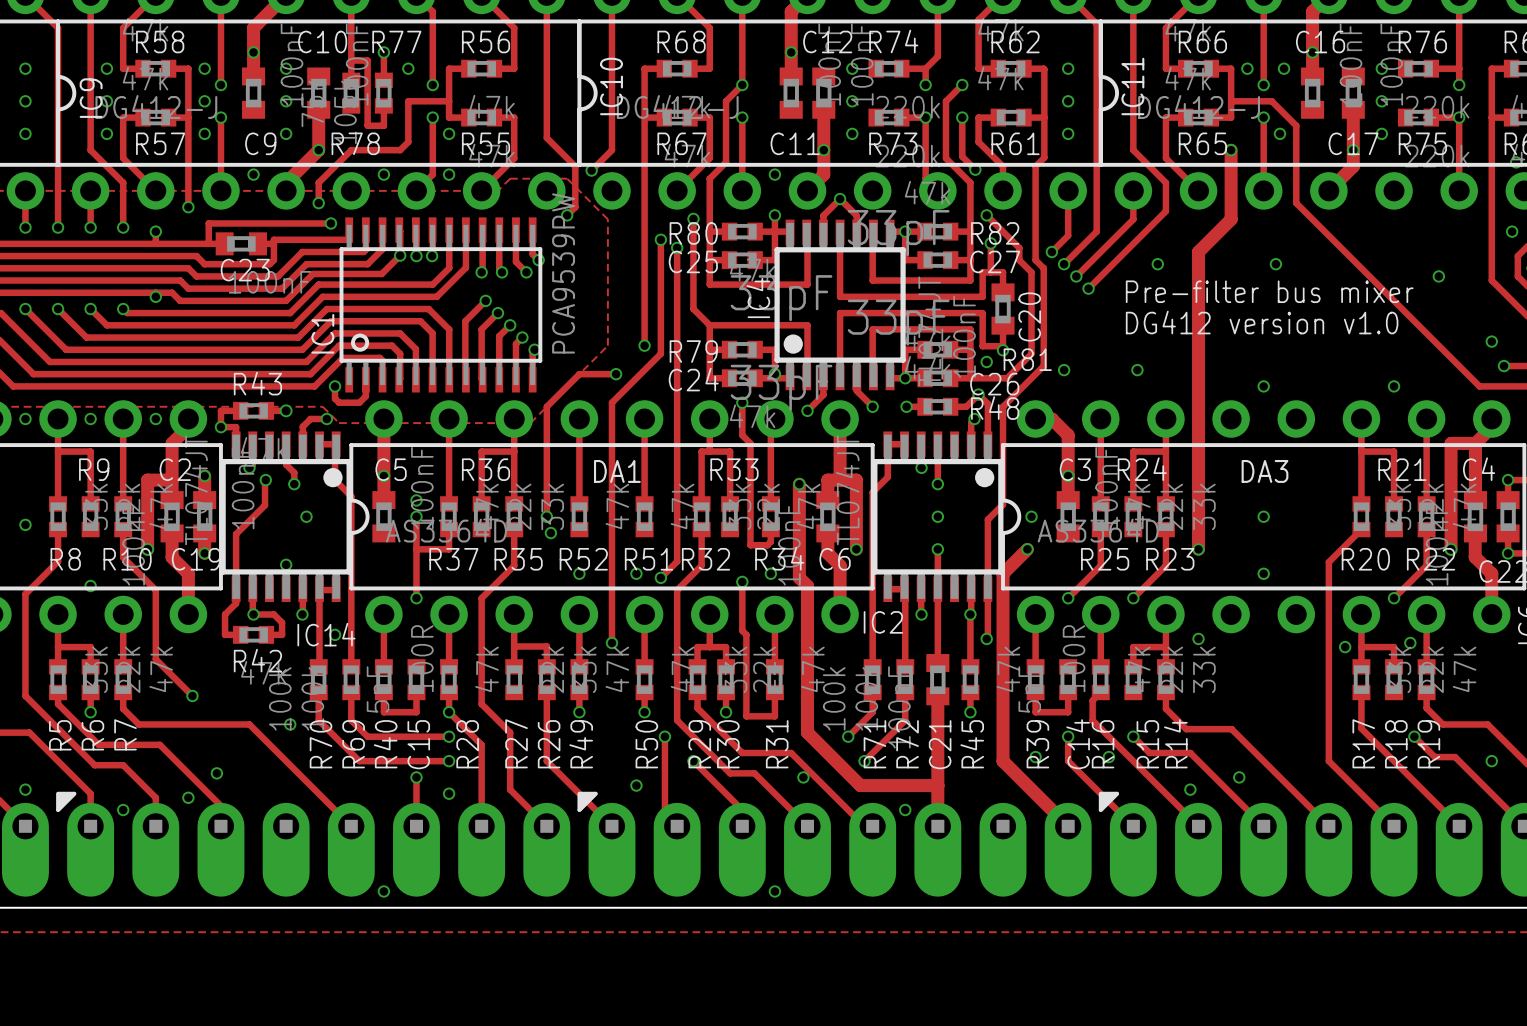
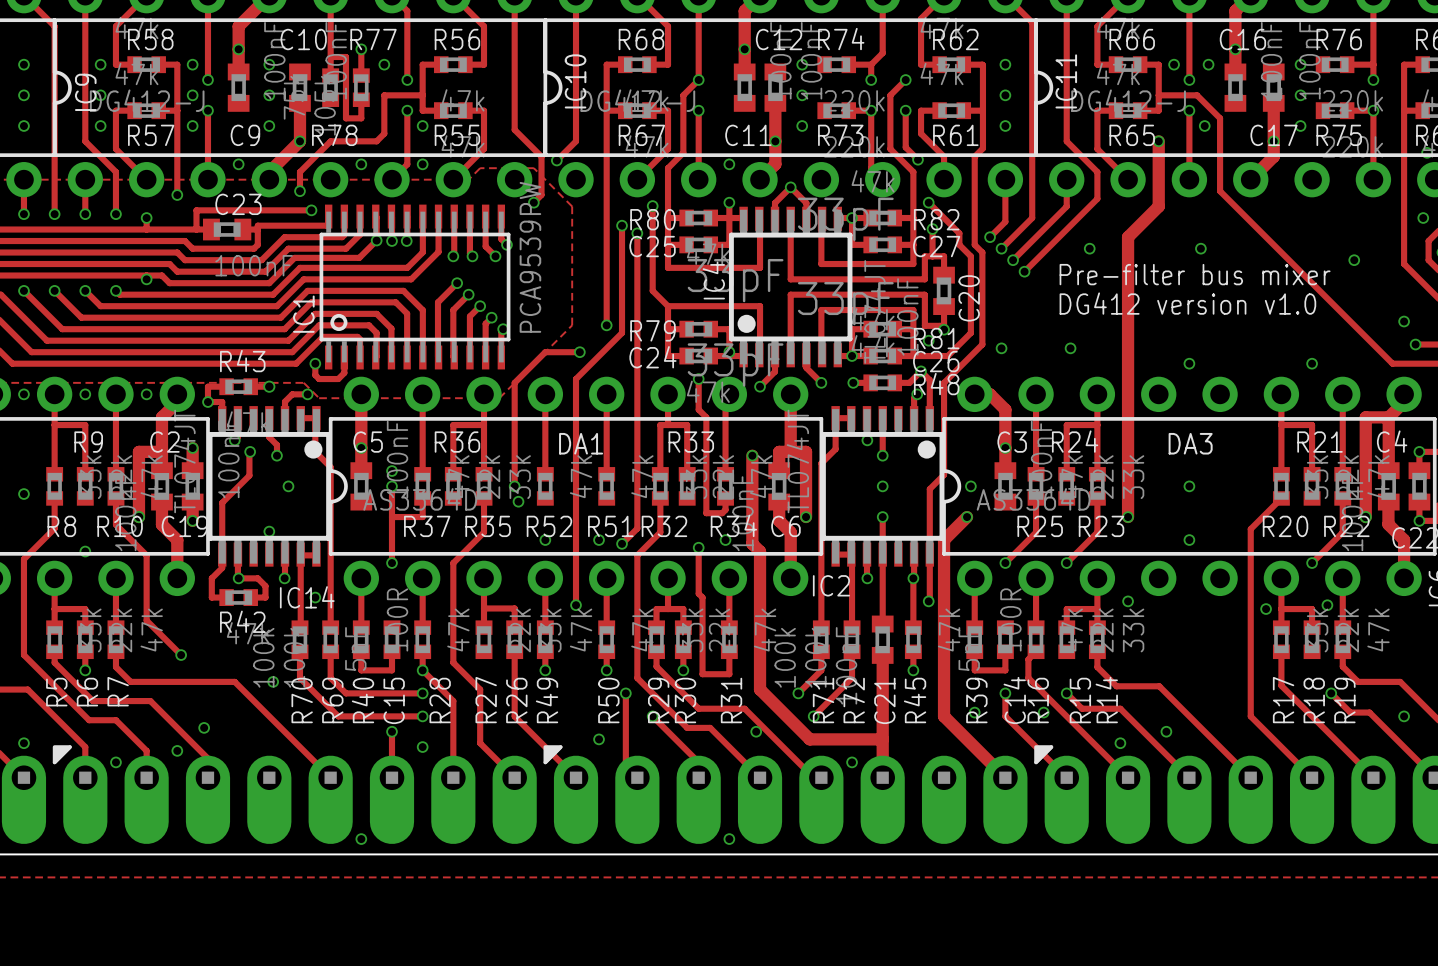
C23 name position: C23 (245, 270) -> C23 (238, 204)
R81 name position: R81 (1027, 359) -> R81 (936, 338)

